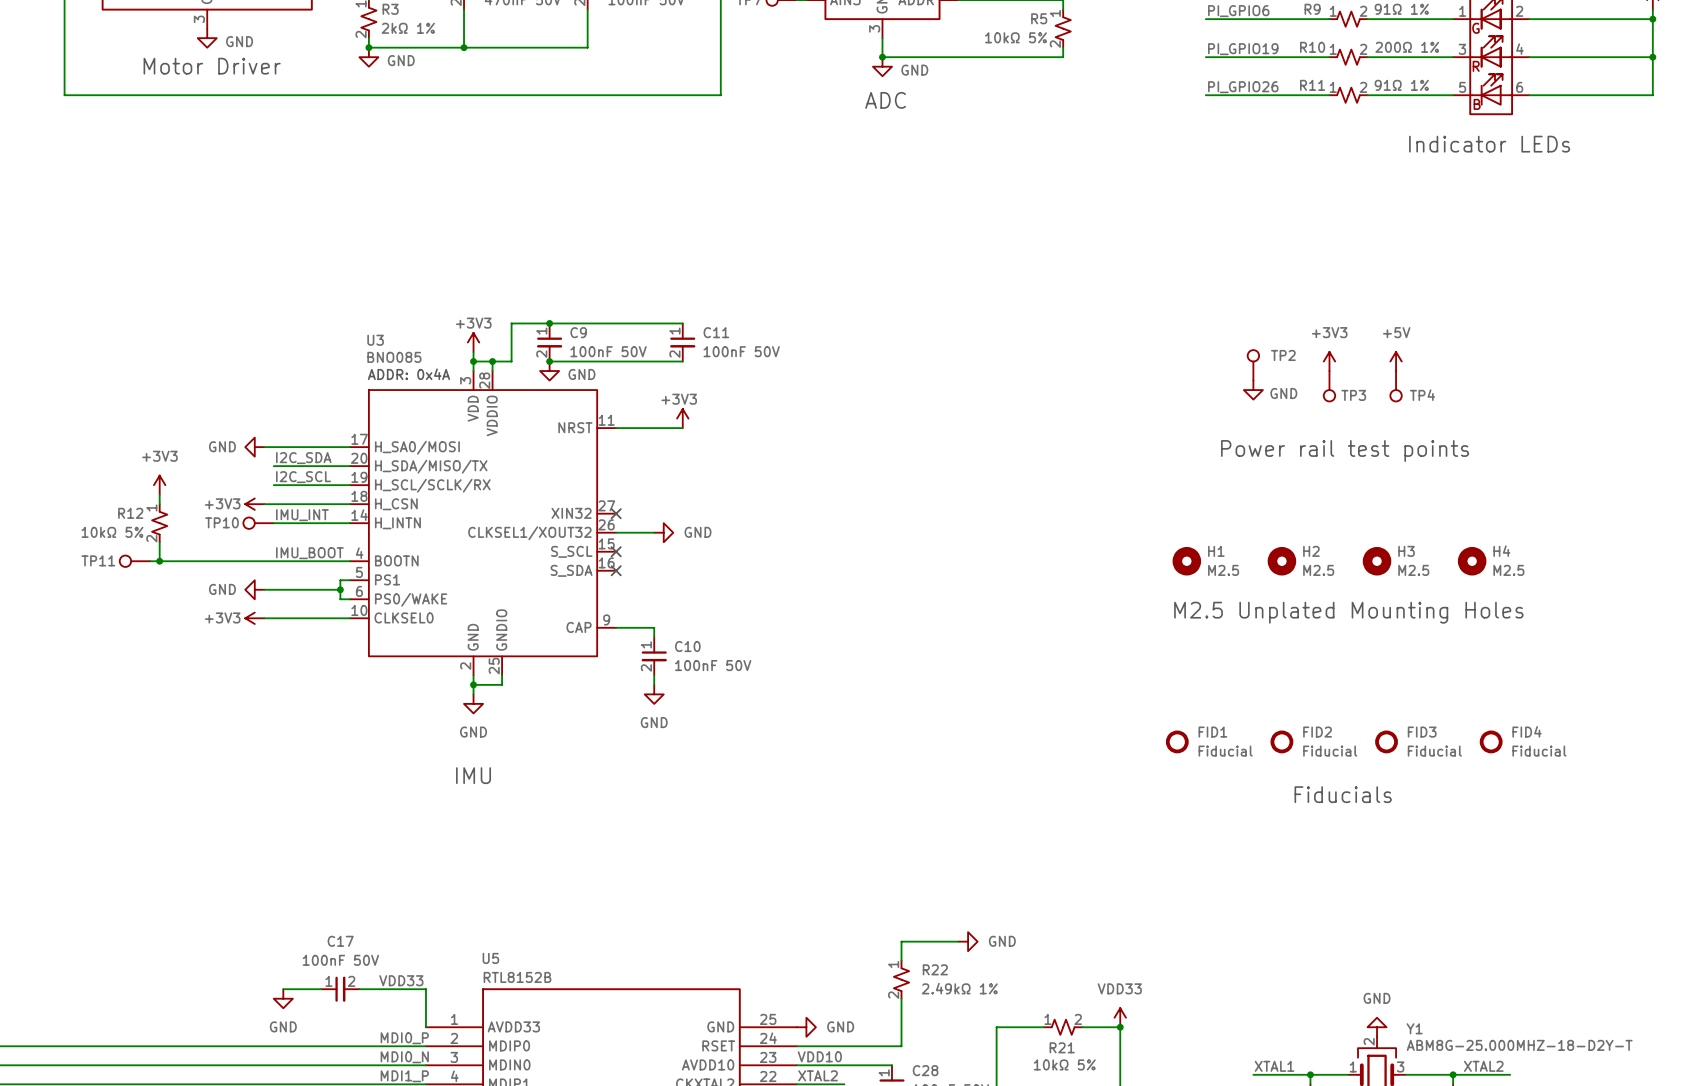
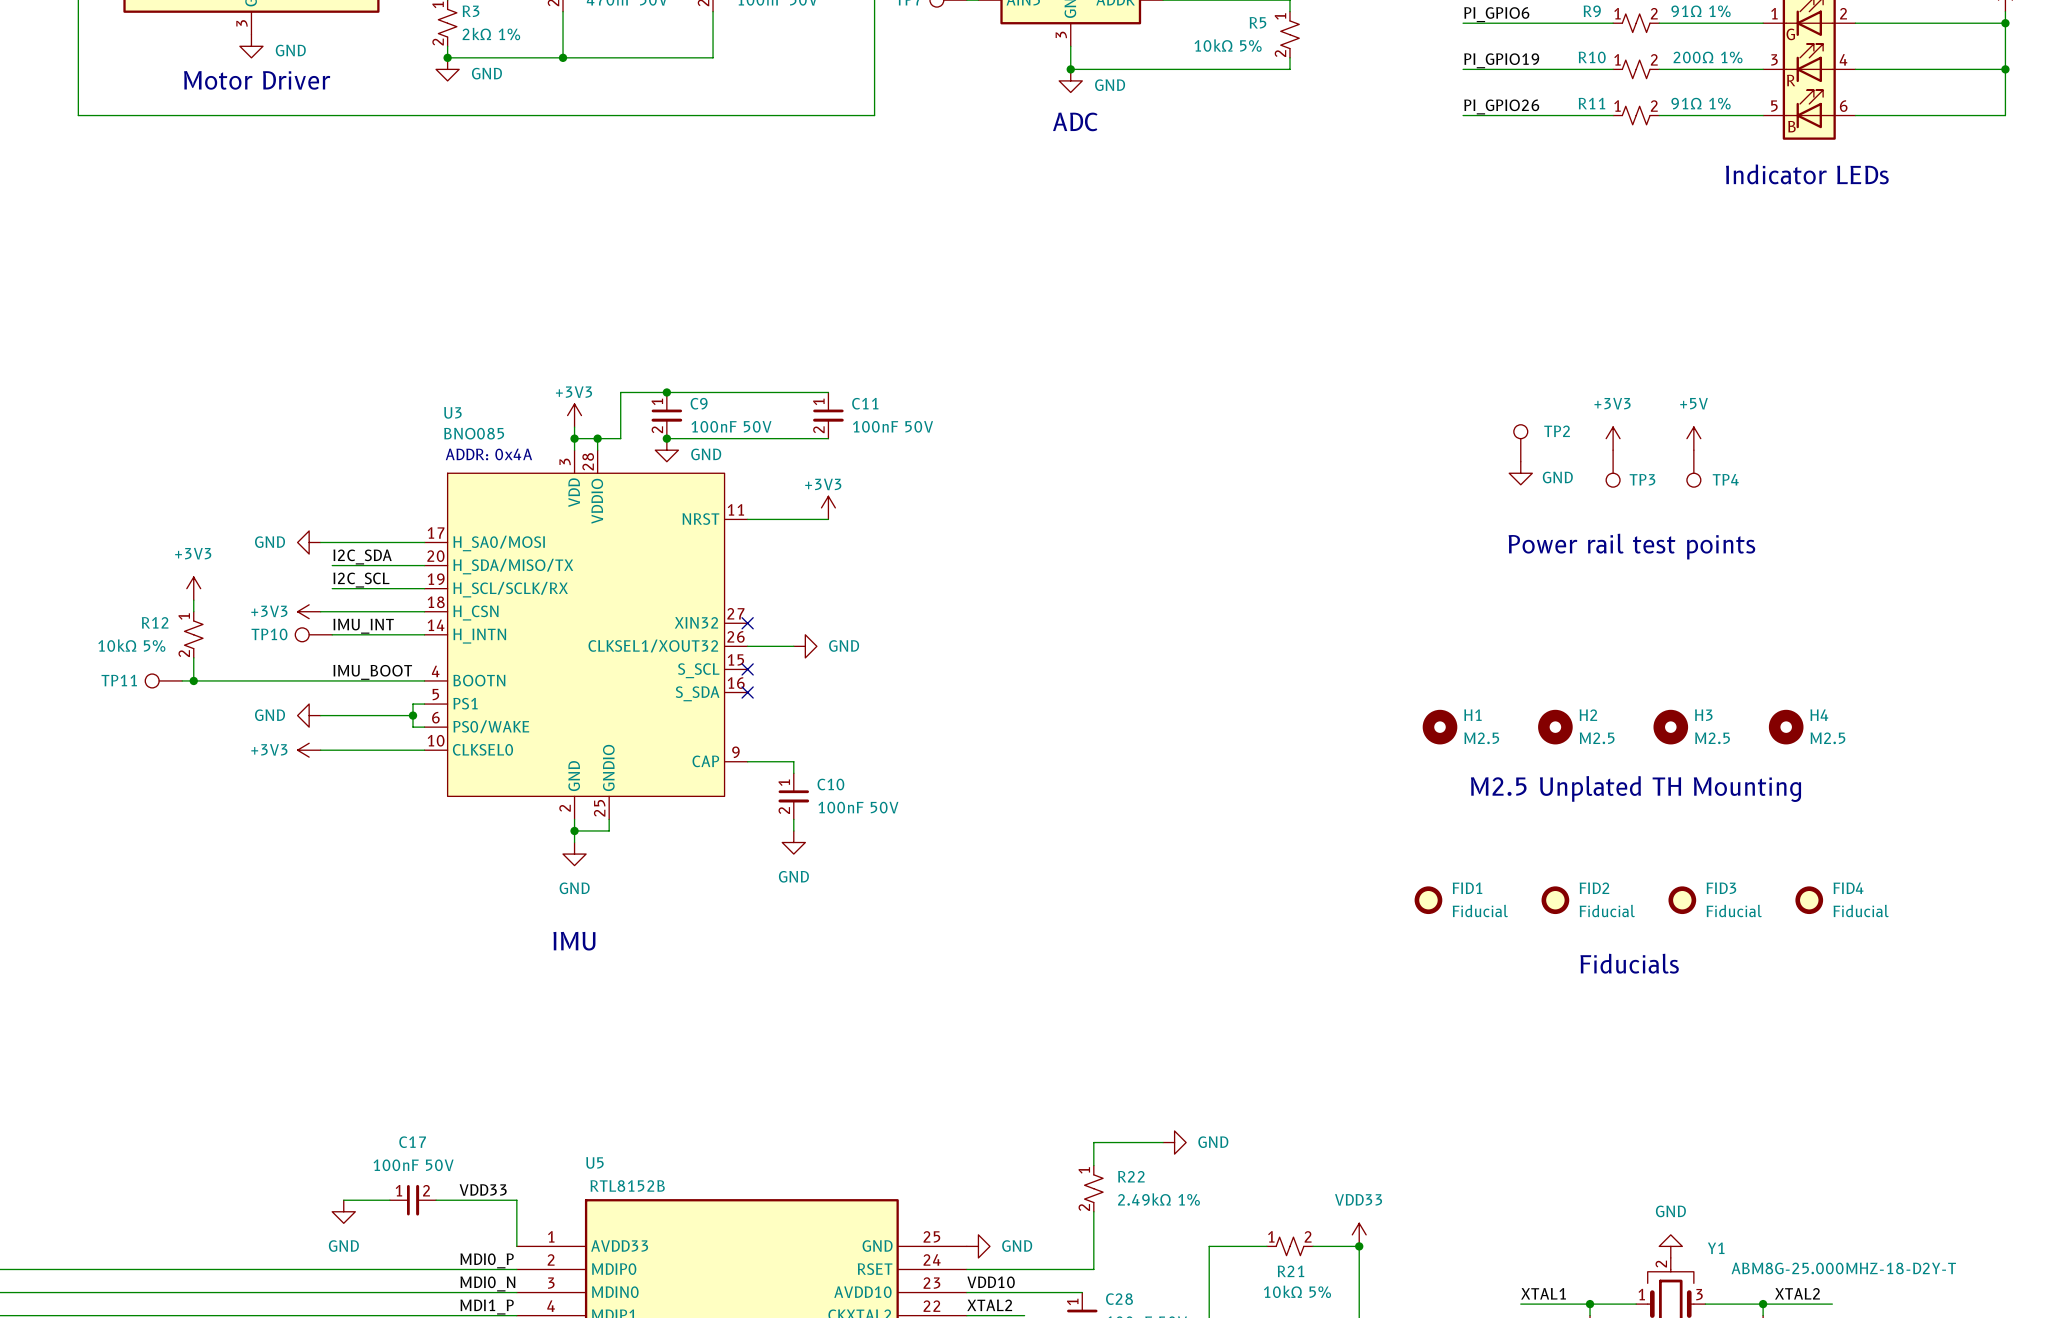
H1 position: (1186, 561) -> (1440, 727)
H2 position: (1281, 561) -> (1555, 727)
H3 position: (1377, 561) -> (1670, 727)
H4 position: (1472, 561) -> (1786, 727)
text: M2.5 Unplated Mounting Holes (1348, 612) -> none
text: none -> M2.5 Unplated TH Mounting (1636, 789)

